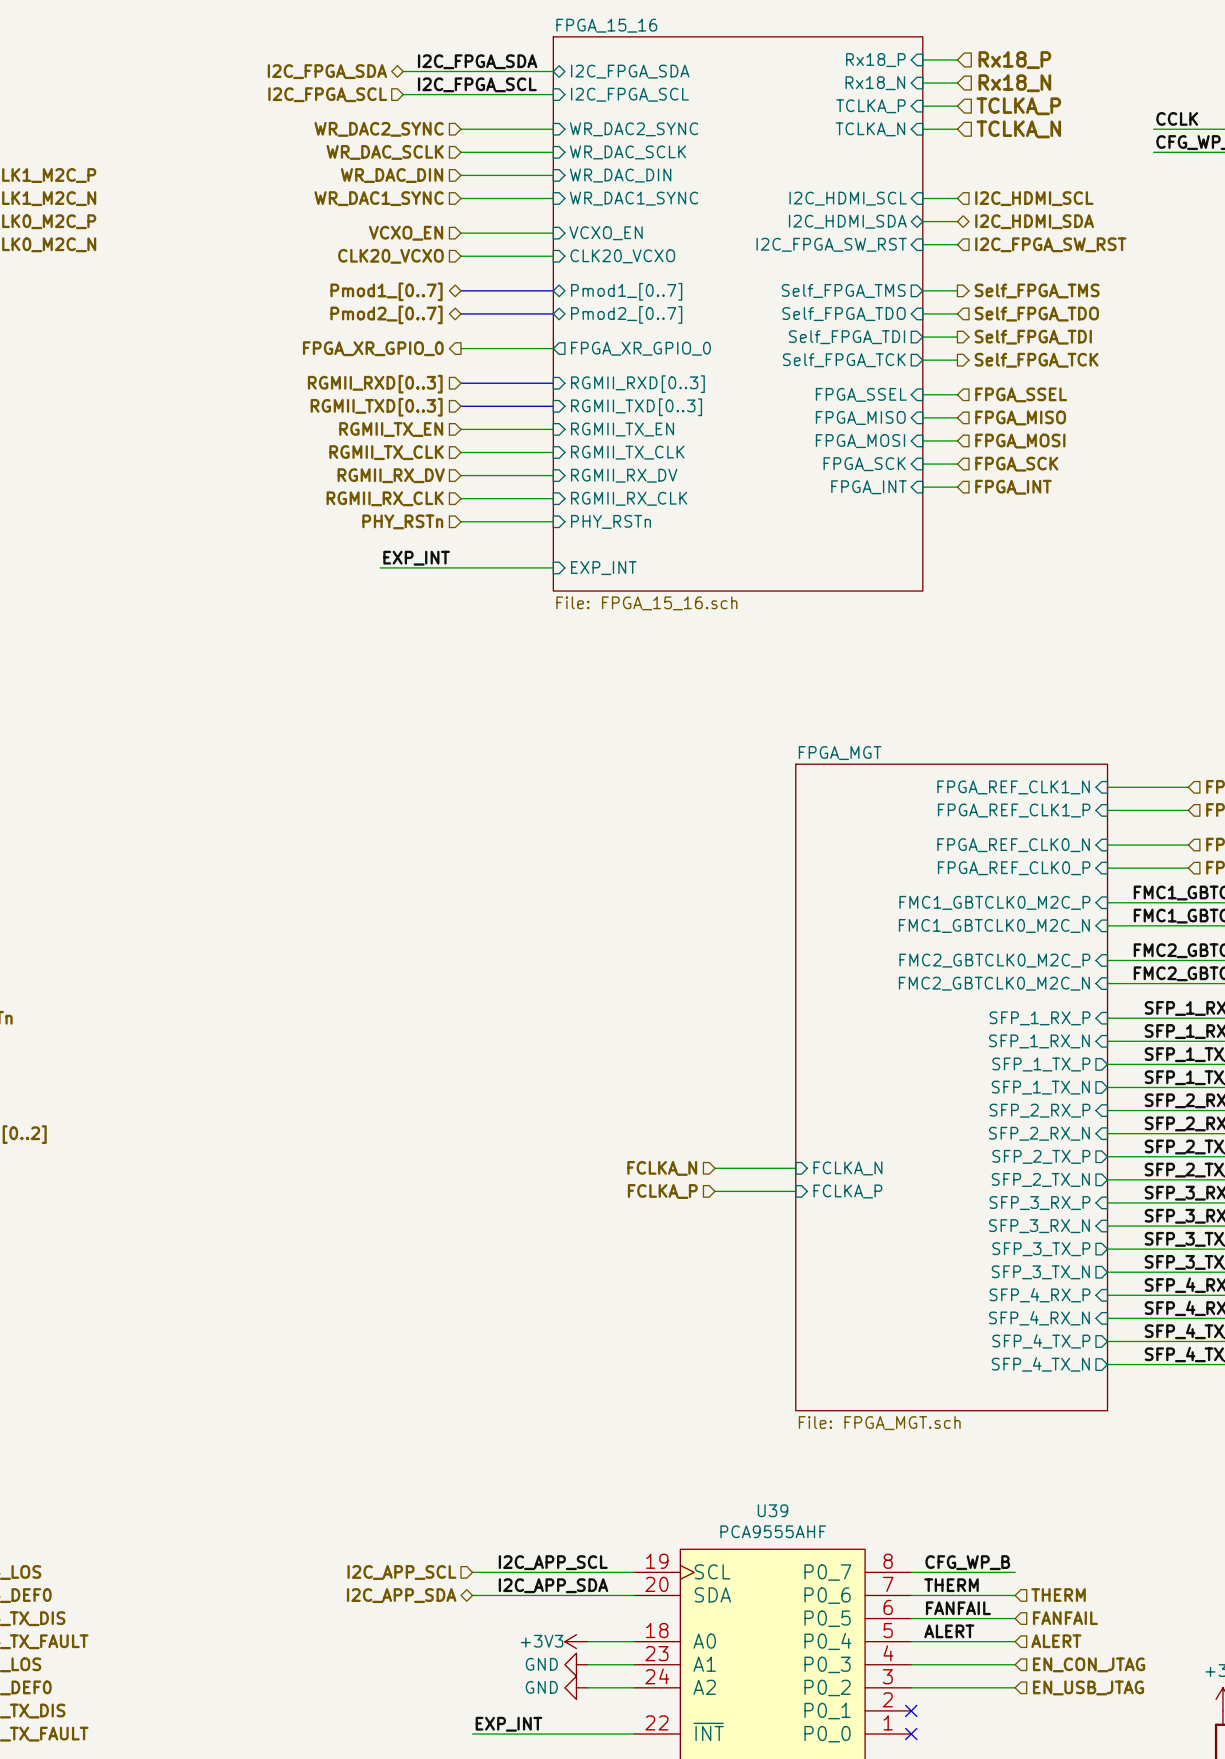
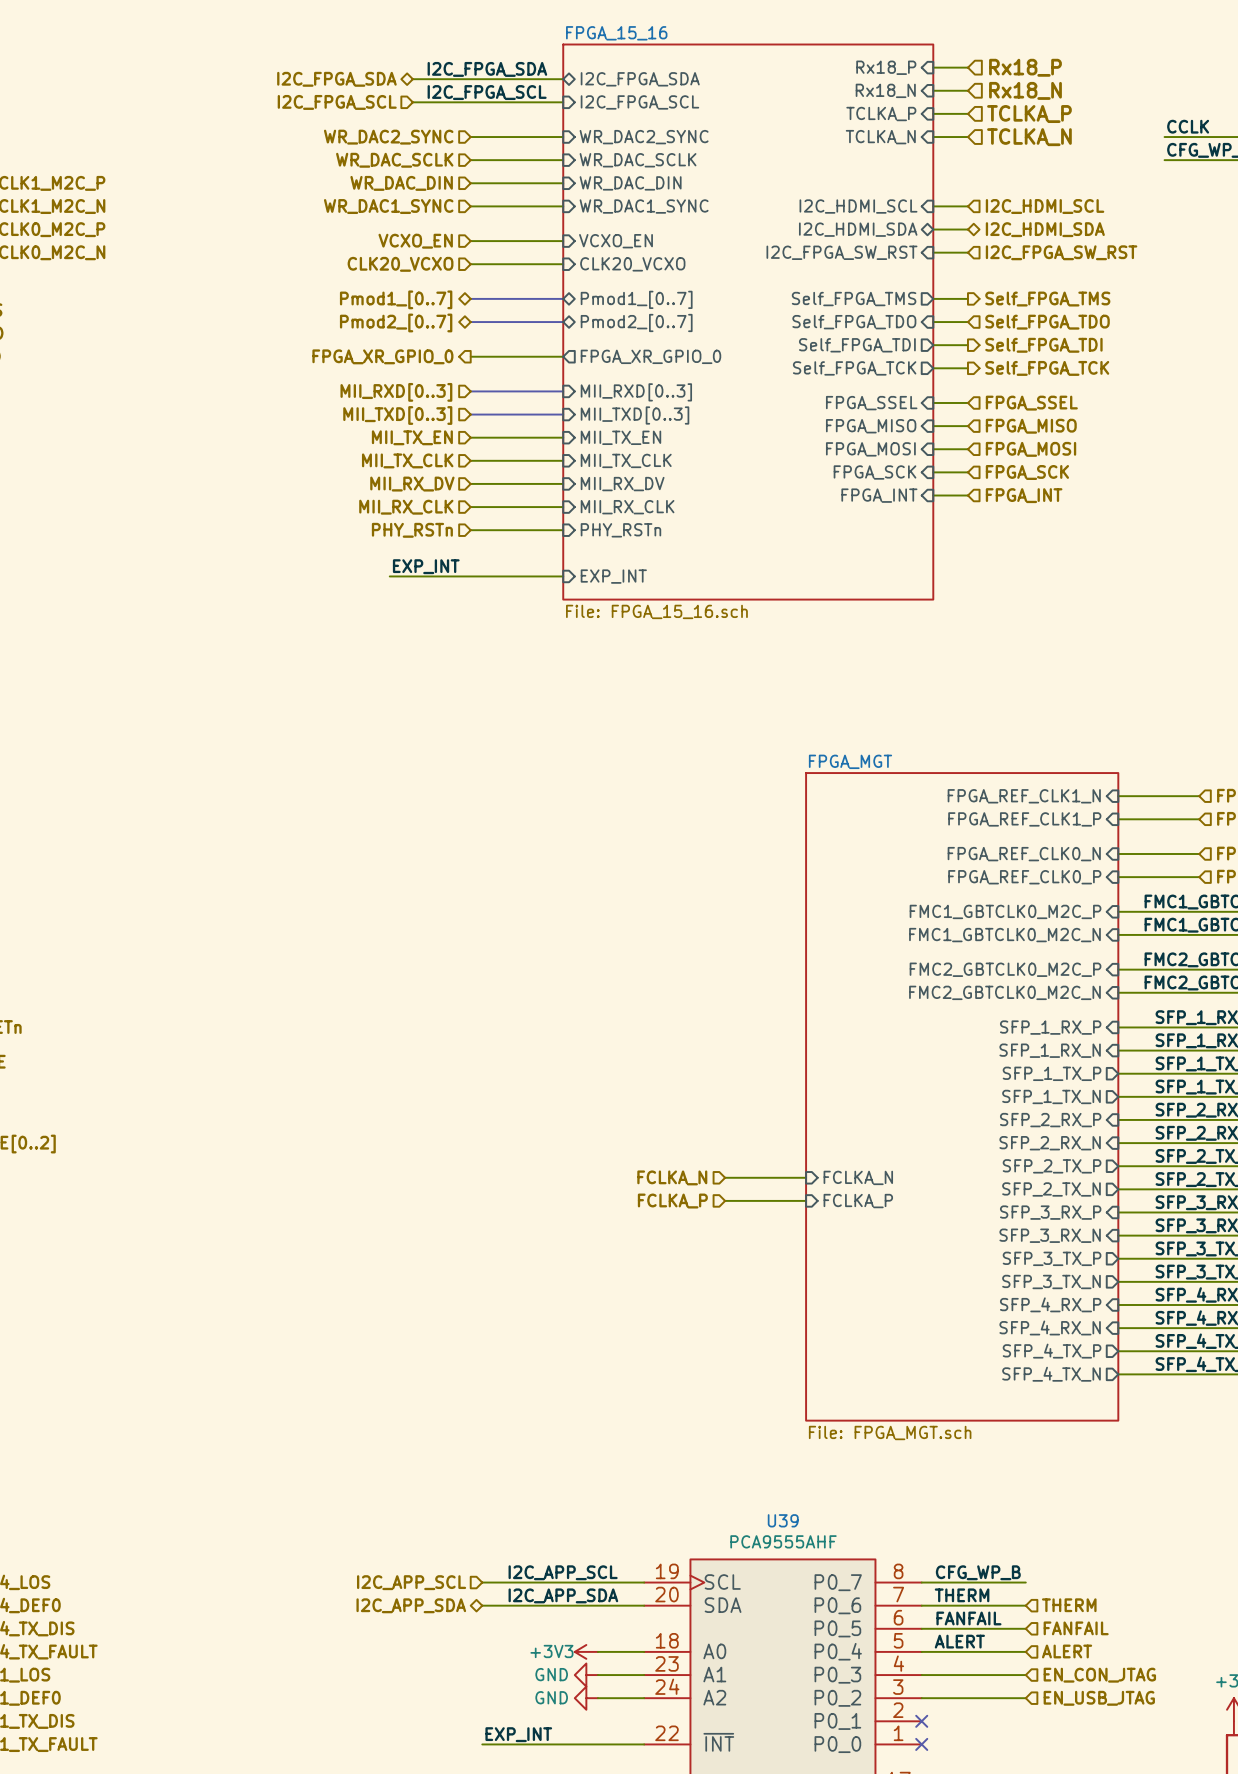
hierarchical label: RGMII_RXD[0..3] (375, 384) -> MII_RXD[0..3] (396, 392)
sheet pin: RGMII_RXD[0..3] (637, 384) -> MII_RXD[0..3] (636, 392)
hierarchical label: RGMII_TXD[0..3] (376, 407) -> MII_TXD[0..3] (397, 415)
sheet pin: RGMII_TXD[0..3] (636, 407) -> MII_TXD[0..3] (635, 415)
hierarchical label: RGMII_TX_EN (391, 429) -> MII_TX_EN (412, 437)
sheet pin: RGMII_TX_EN (622, 429) -> MII_TX_EN (620, 437)
hierarchical label: RGMII_TX_CLK (386, 452) -> MII_TX_CLK (407, 460)
sheet pin: RGMII_TX_CLK (627, 452) -> MII_TX_CLK (626, 460)
hierarchical label: RGMII_RX_DV (391, 475) -> MII_RX_DV (412, 484)
sheet pin: RGMII_RX_DV (624, 475) -> MII_RX_DV (622, 484)
hierarchical label: RGMII_RX_CLK (385, 498) -> MII_RX_CLK (406, 507)
sheet pin: RGMII_RX_CLK (629, 498) -> MII_RX_CLK (627, 507)

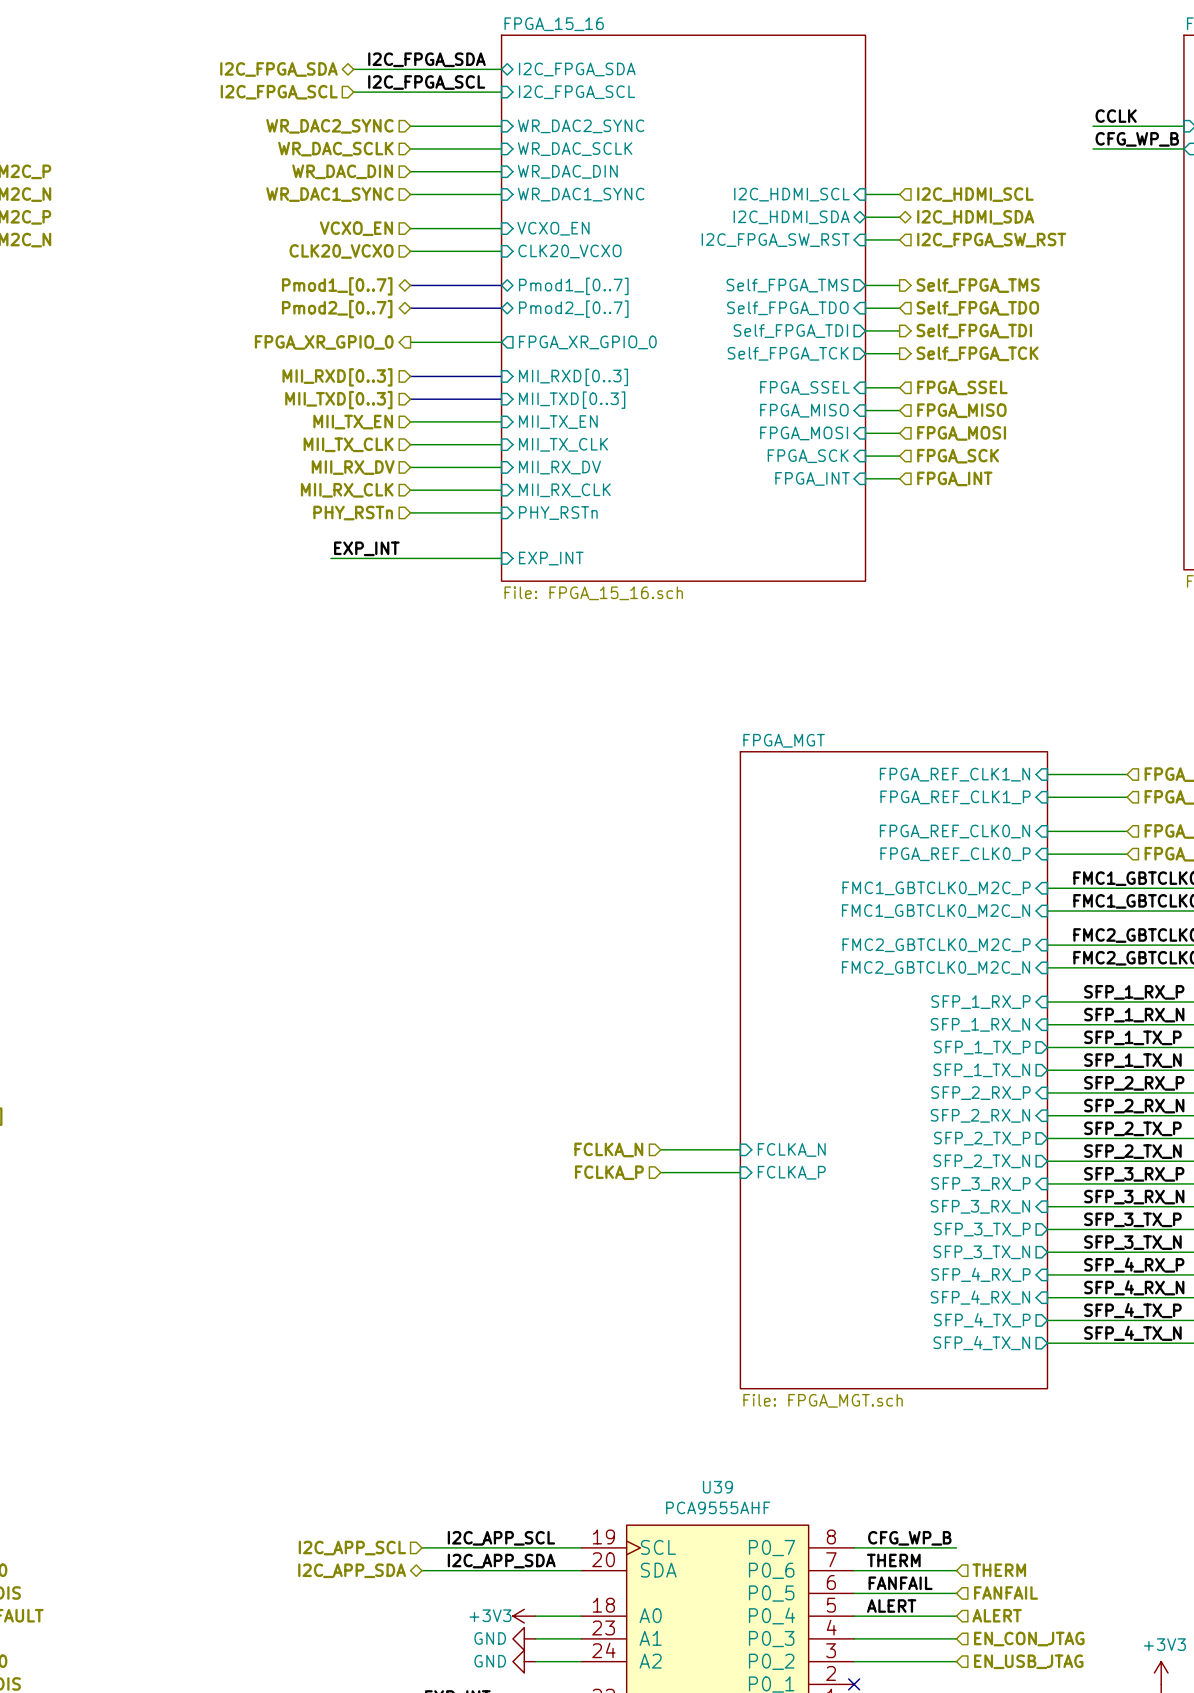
sheet pin: Rx18_P (886, 67) -> none
wire: (933, 67) (967, 67) -> none
hierarchical label: Rx18_P (1025, 67) -> none
sheet pin: Rx18_N (885, 90) -> none
wire: (933, 90) (967, 90) -> none
hierarchical label: Rx18_N (1025, 90) -> none
wire: (933, 113) (967, 113) -> none
sheet pin: TCLKA_P (881, 114) -> none
hierarchical label: TCLKA_P (1029, 114) -> none
sheet pin: TCLKA_N (880, 137) -> none
wire: (933, 137) (967, 137) -> none
hierarchical label: TCLKA_N (1029, 137) -> none

